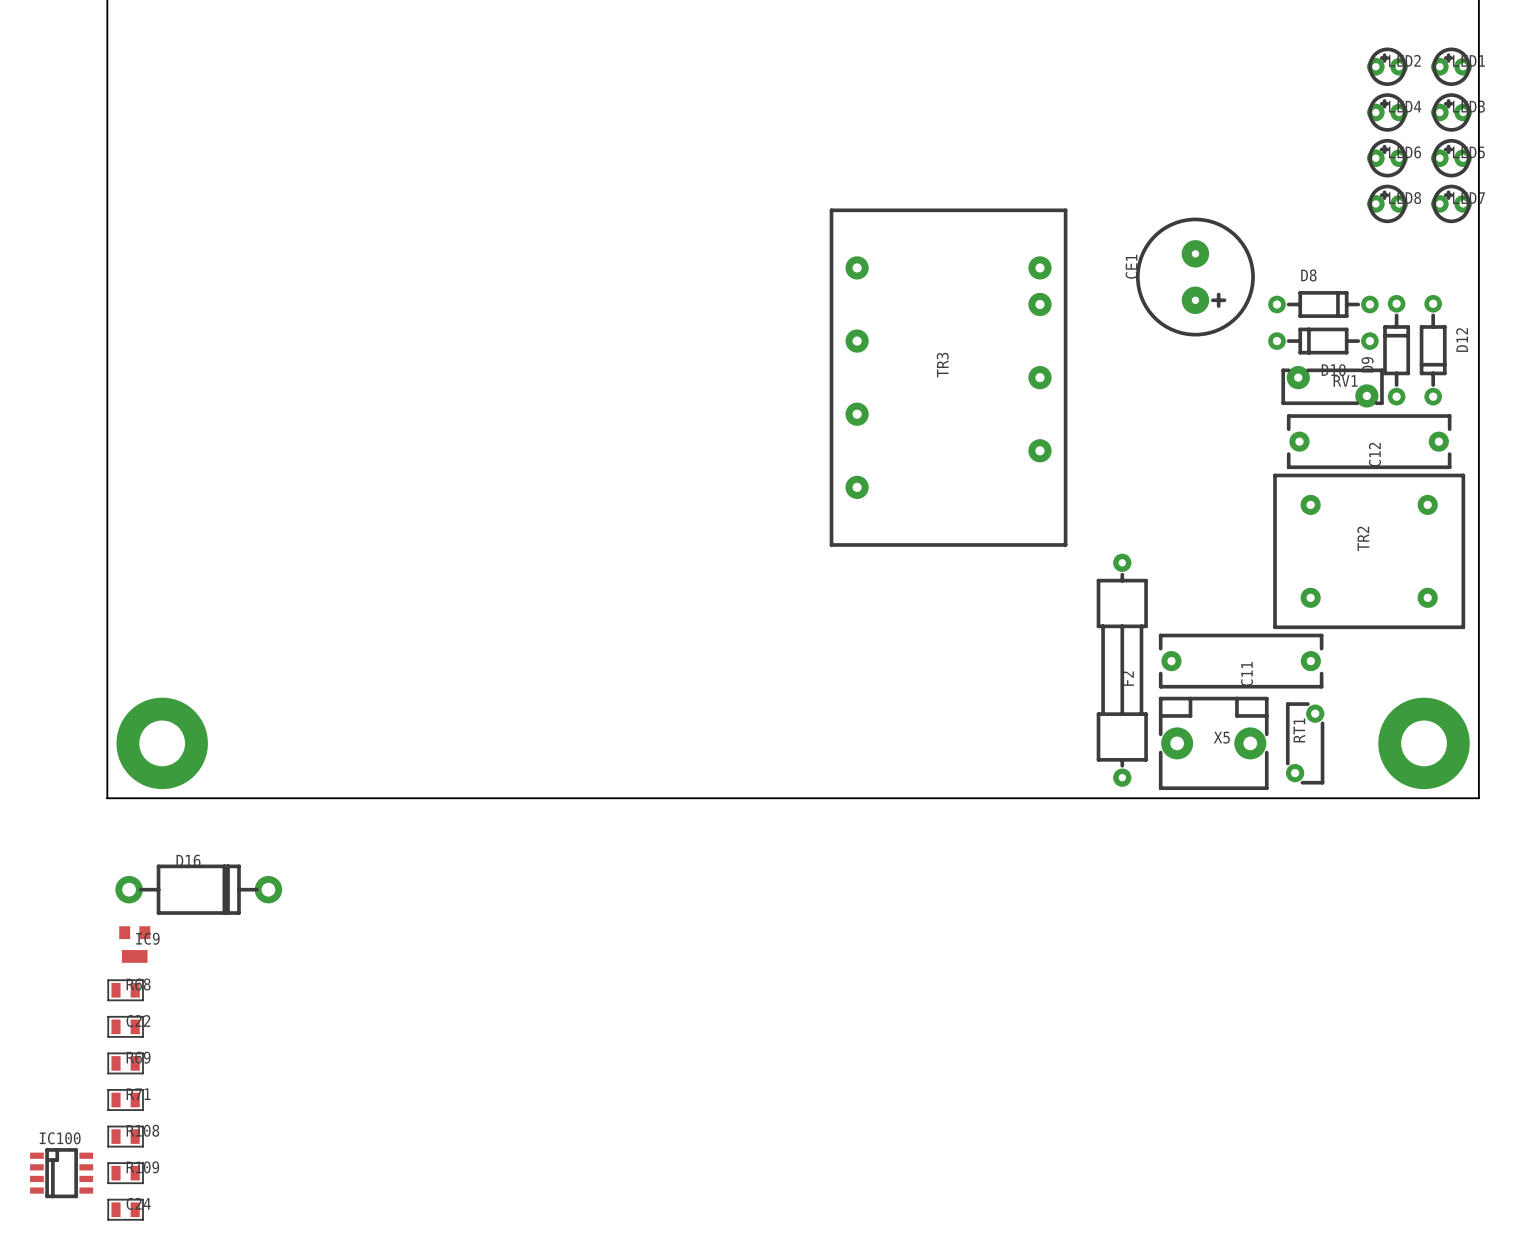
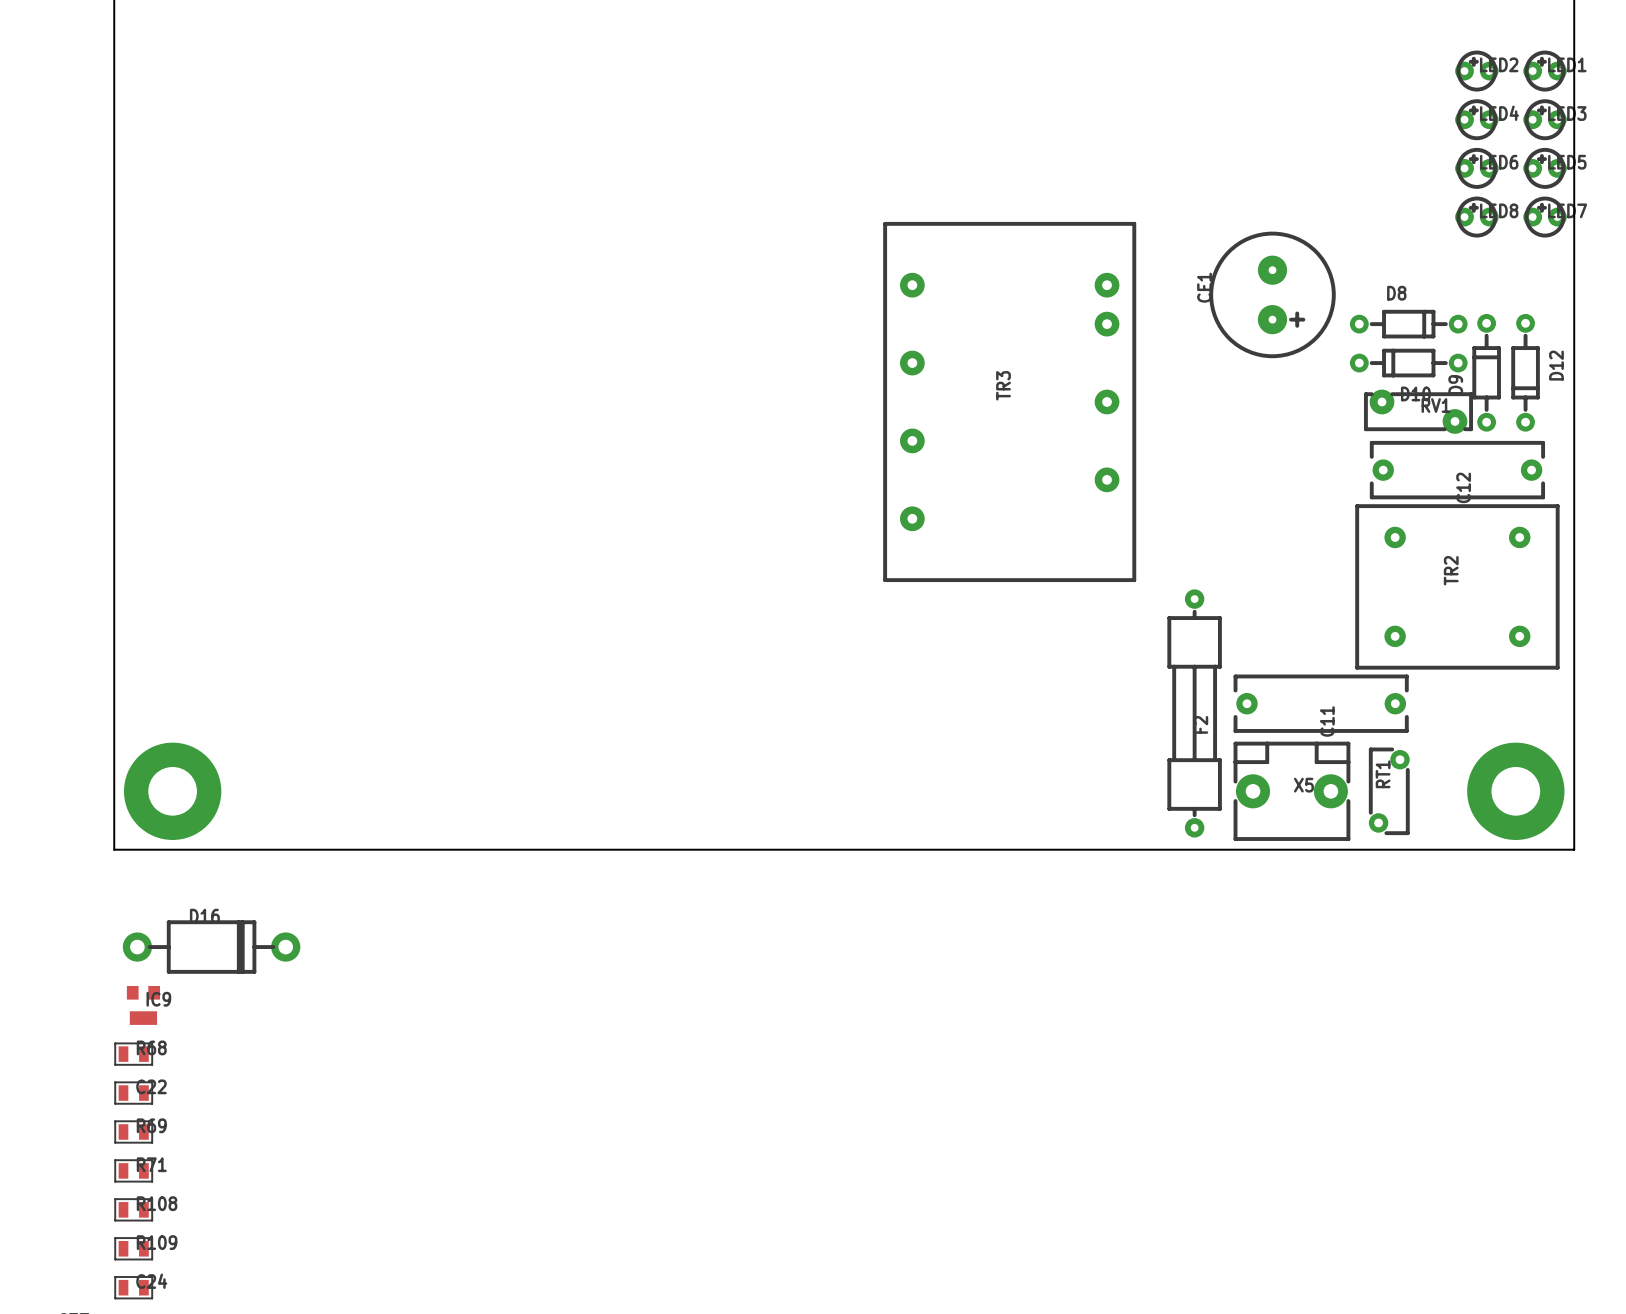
IC100: (61, 1173) -> none

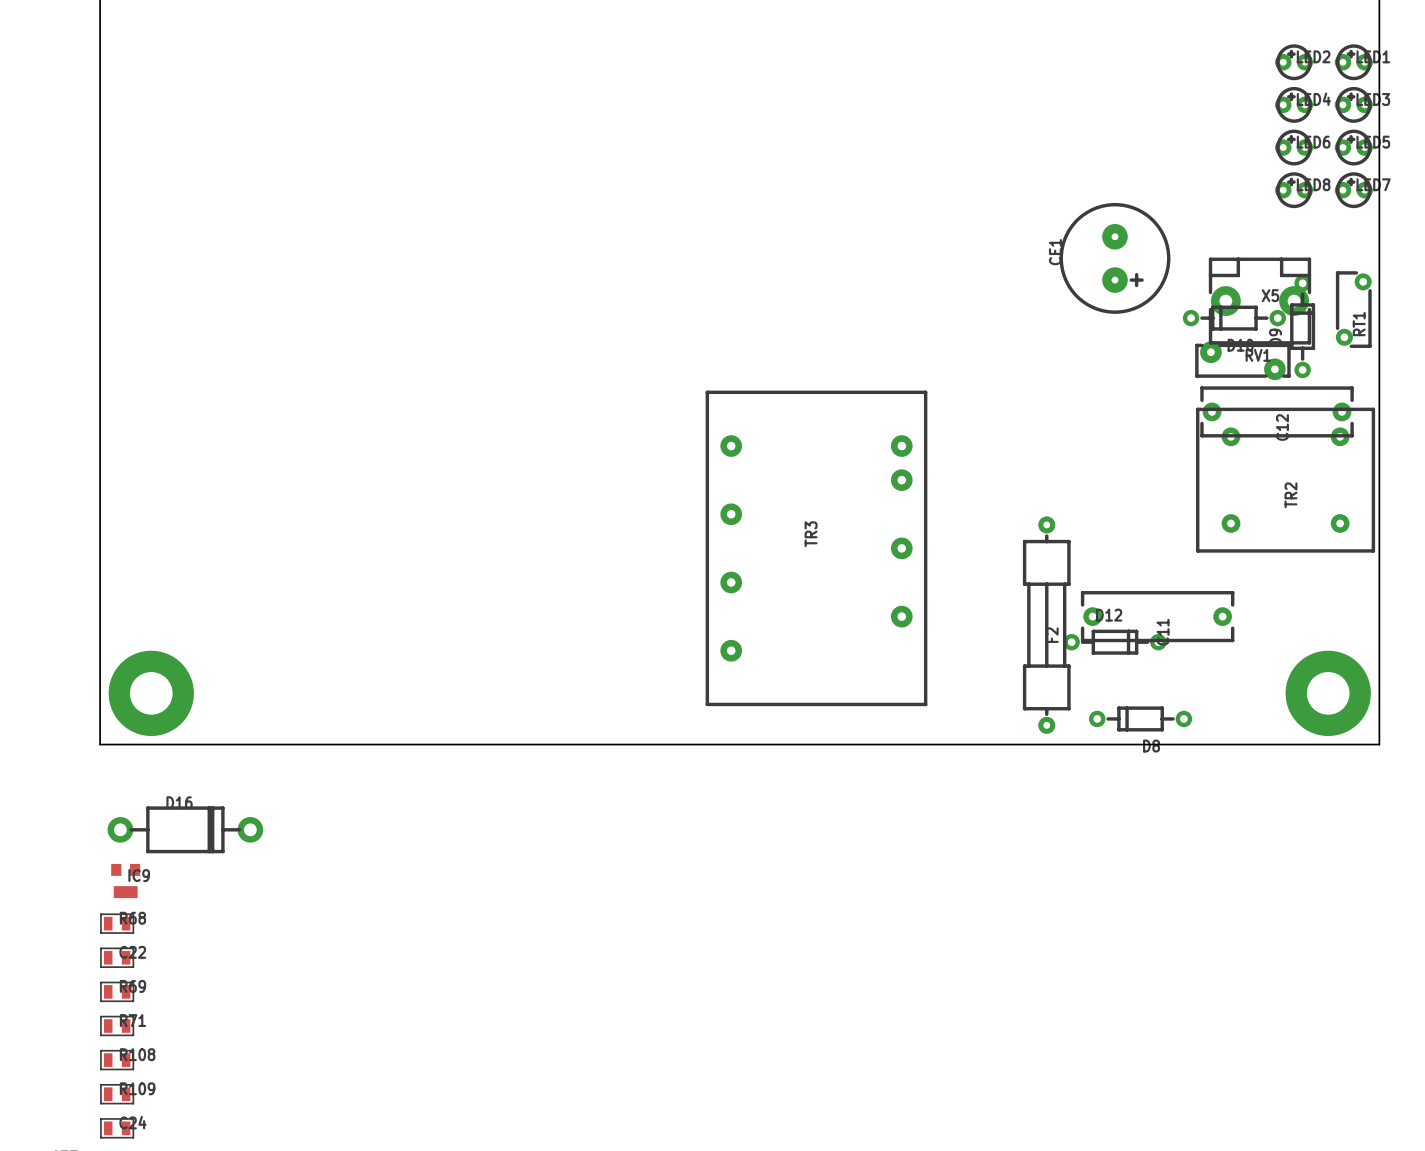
D8 rotation: 0° (1408, 324) -> 180° (1140, 718)
D8 position: (1408, 324) -> (1140, 718)
D12 rotation: 0° (1525, 372) -> 90° counterclockwise (1114, 642)
D12 position: (1525, 372) -> (1114, 642)
TR3 position: (1009, 401) -> (816, 548)
TR2 name position: TR2 (1451, 570) -> TR2 (1290, 495)
TR2 position: (1457, 586) -> (1285, 480)
RT1 name position: RT1 (1383, 774) -> RT1 (1359, 324)
X5 position: (1291, 791) -> (1259, 301)
RT1 position: (1389, 791) -> (1353, 309)

